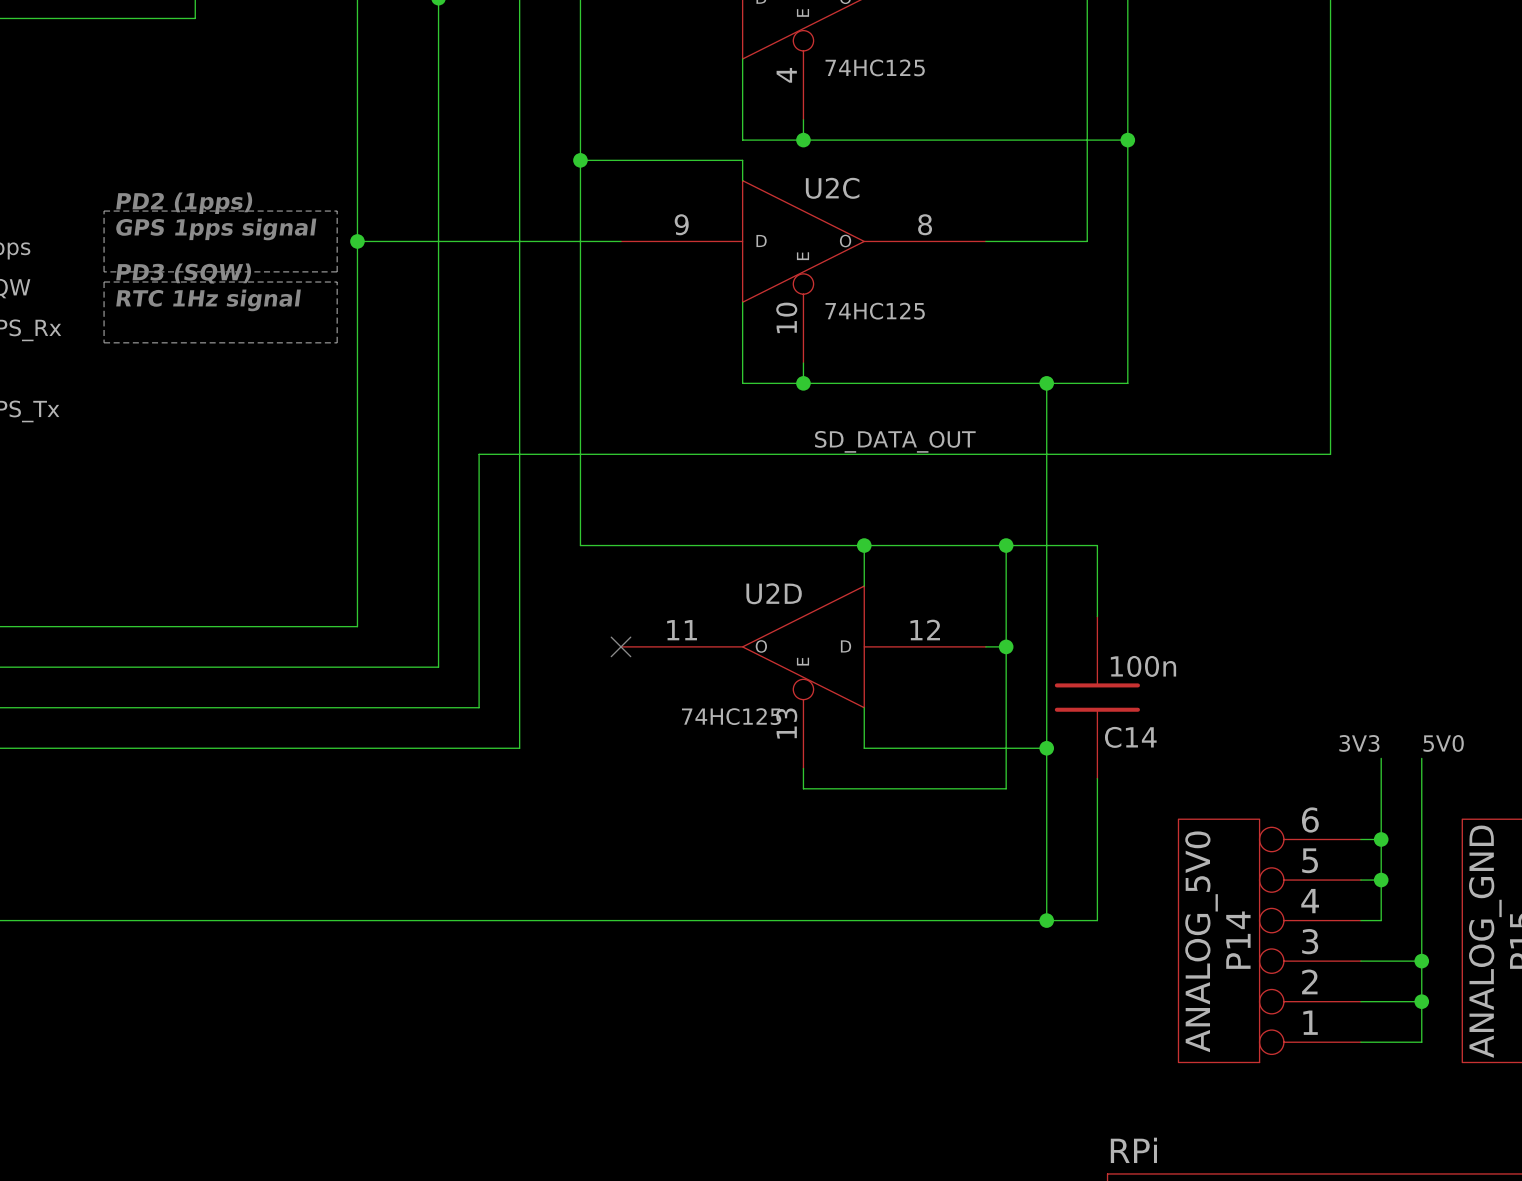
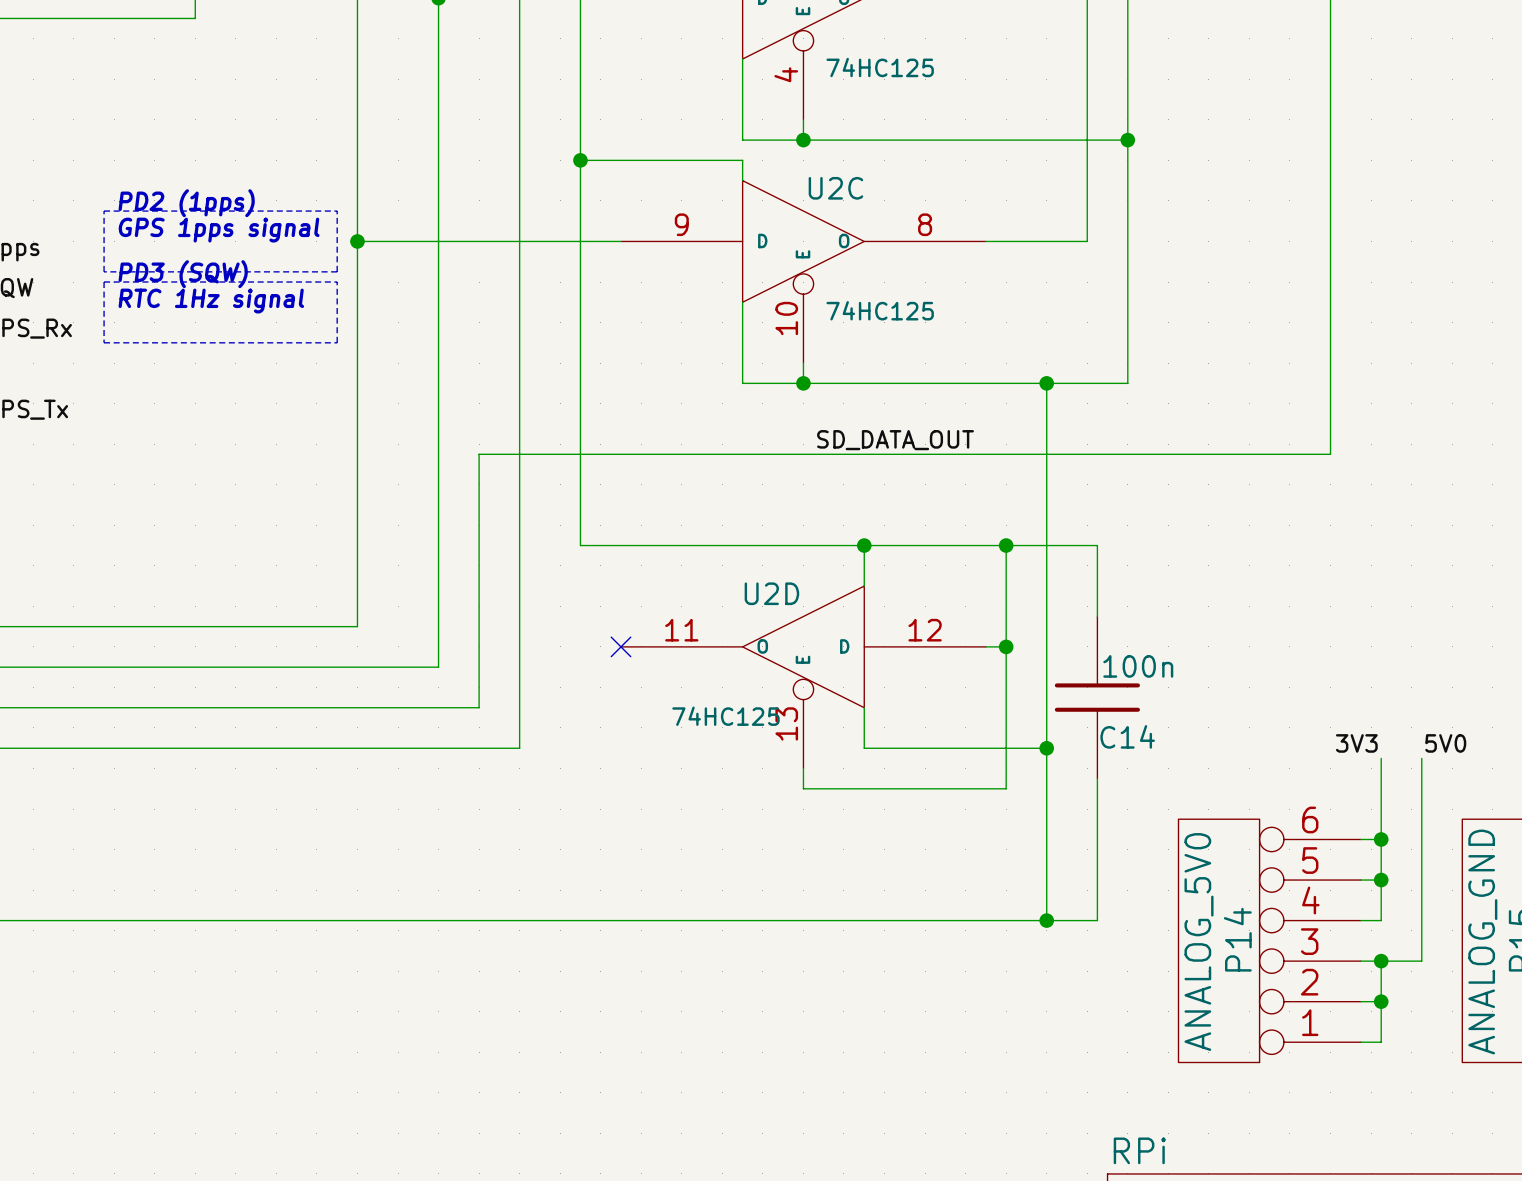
junction: none -> (1381, 961)
wire: (1421, 961) (1421, 1042) (1381, 1042) -> (1381, 961) (1381, 1042)
junction: (1421, 961) -> none
wire: (1381, 1001) (1421, 1001) -> none
junction: none -> (1381, 1001)
junction: (1421, 1001) -> none

